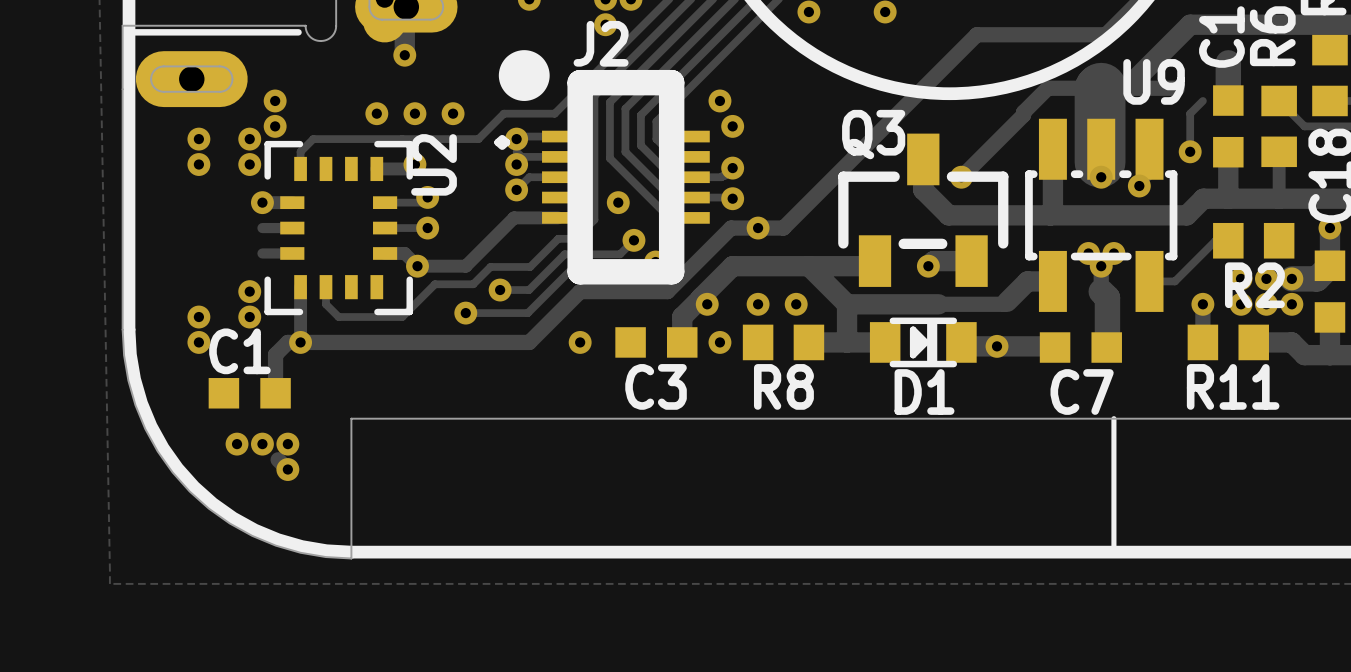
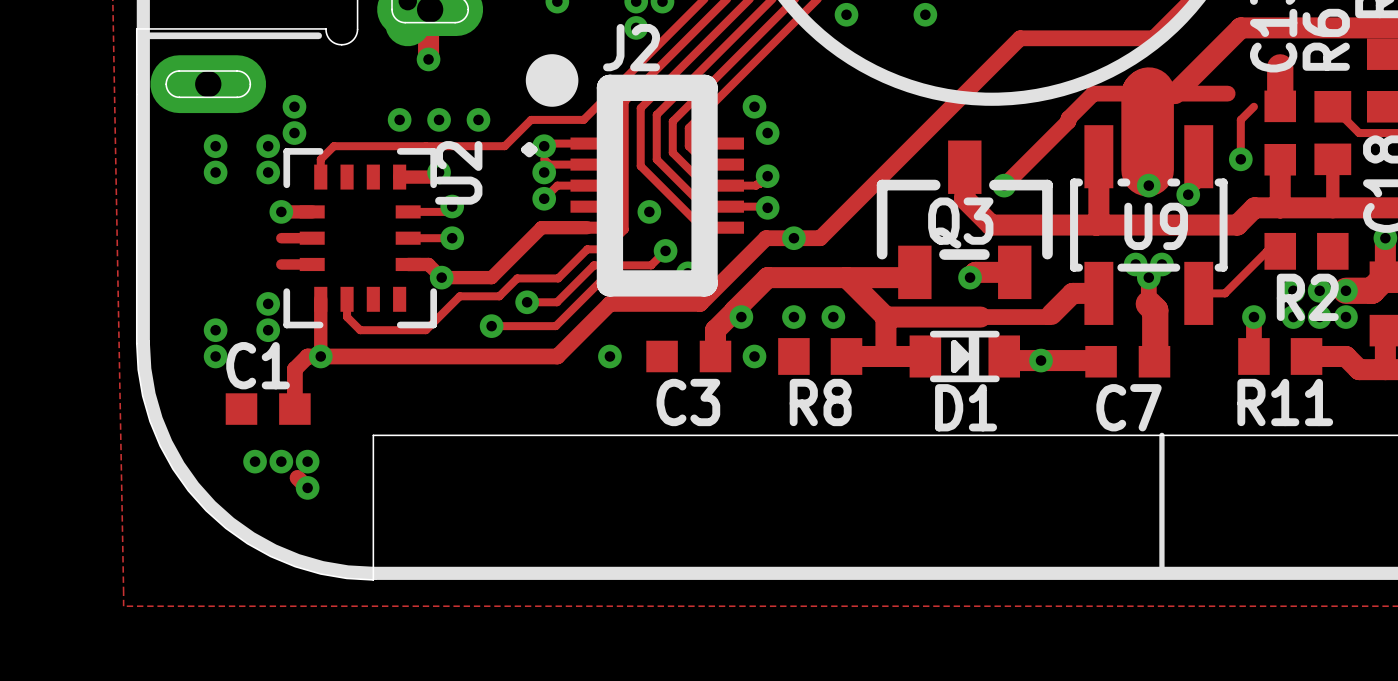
text position: U9 (1154, 81) -> U9 (1156, 226)
Q3 name position: Q3 (873, 134) -> Q3 (960, 222)

